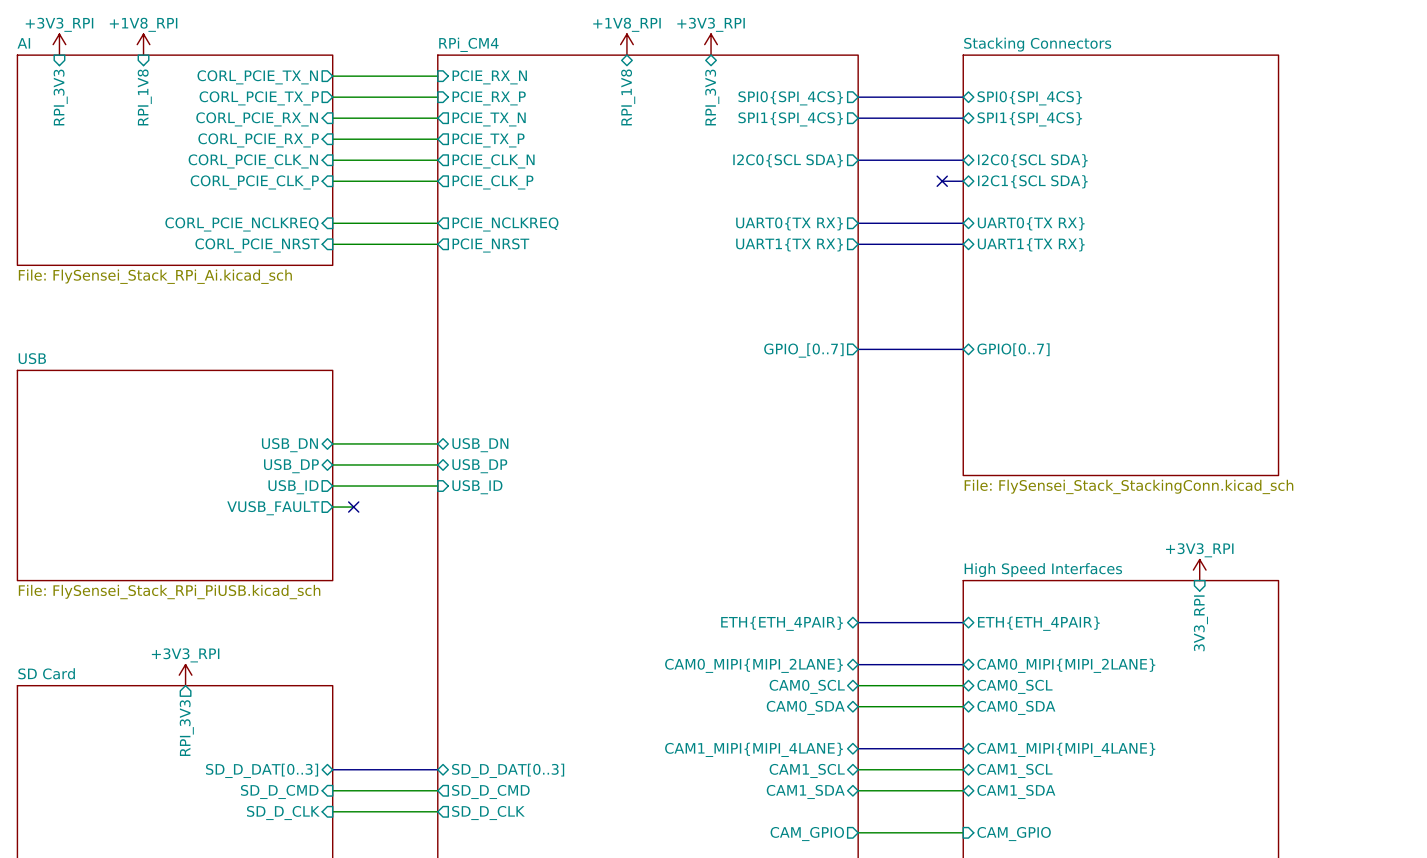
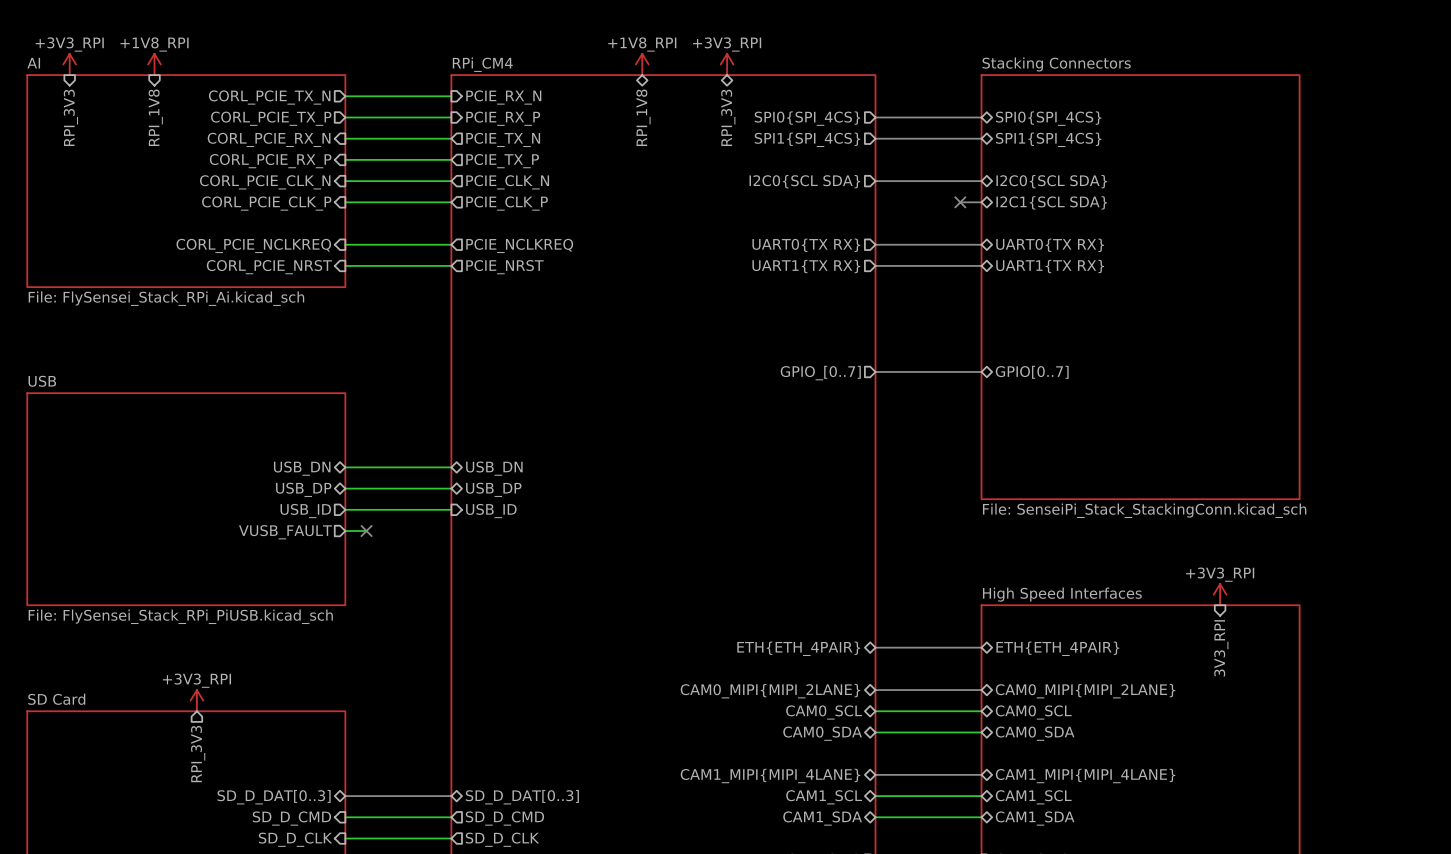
sheet Stacking Connectors value: File: FlySensei_Stack_StackingConn.kicad_sch (1128, 486) -> File: SenseiPi_Stack_StackingConn.kicad_sch (1144, 510)

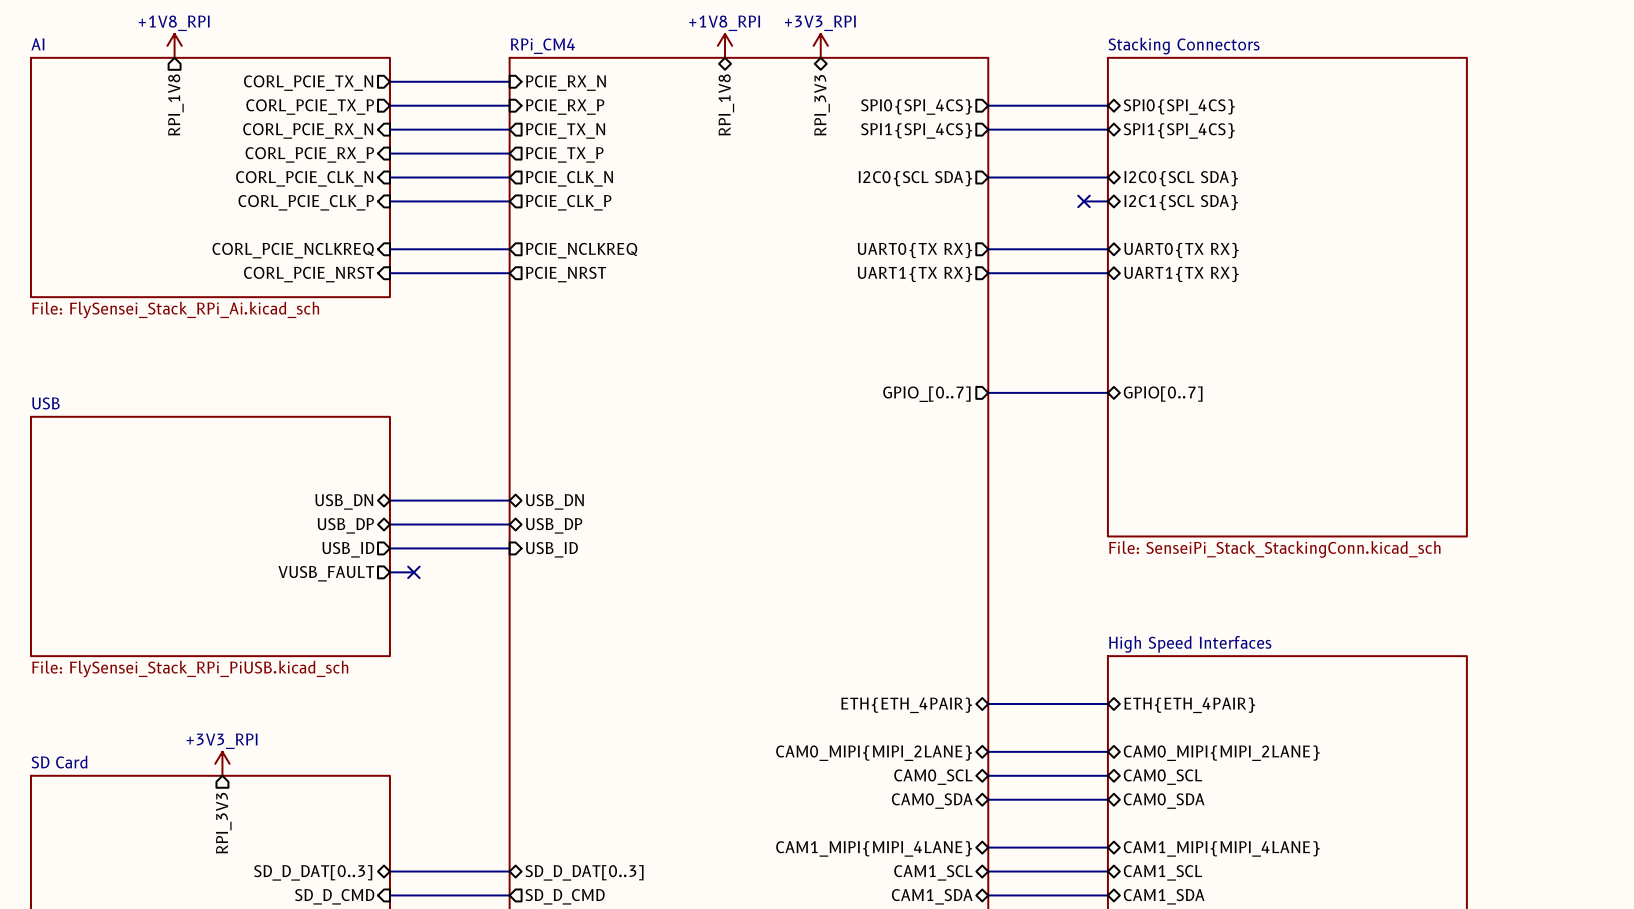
power symbol: +3V3_RPI (69, 64) -> none
sheet pin: RPI_3V3 (70, 117) -> none
sheet pin shape: input (155, 117) -> output (175, 104)
power symbol: +3V3_RPI (1220, 594) -> none
sheet pin: 3V3_RPI (1221, 648) -> none

